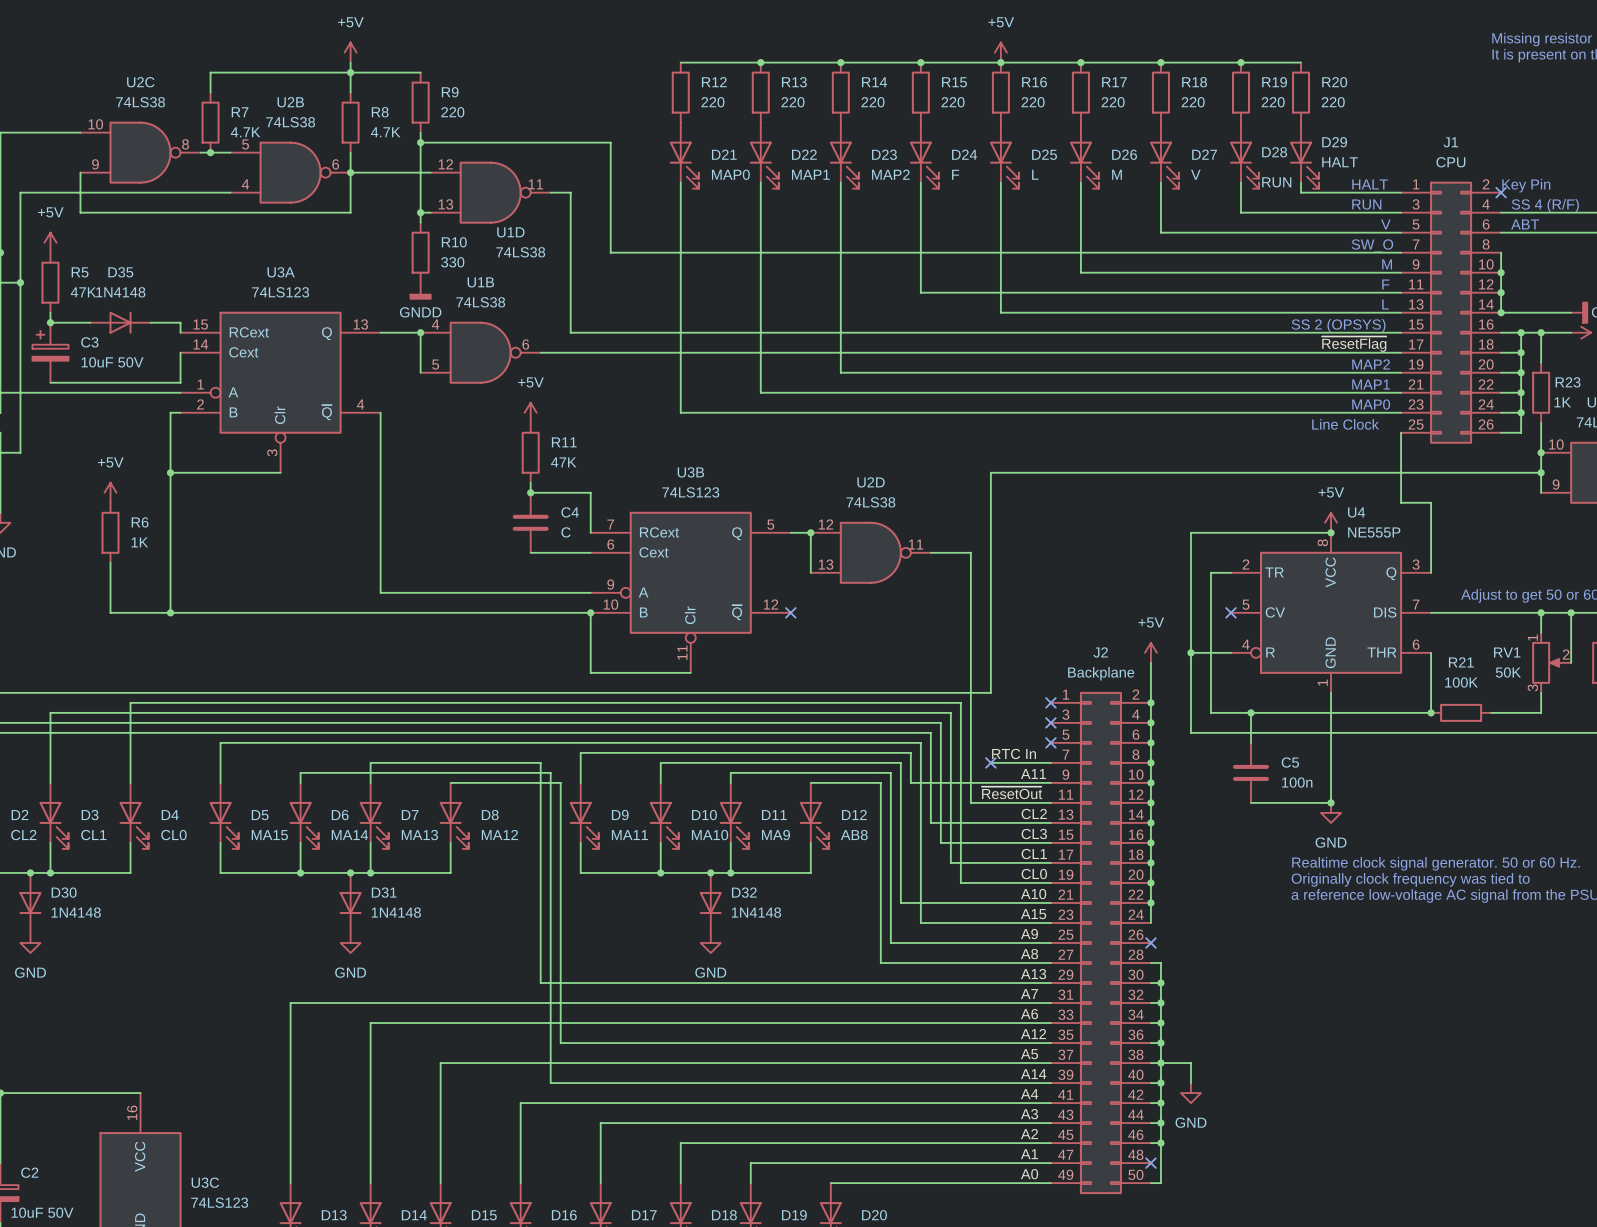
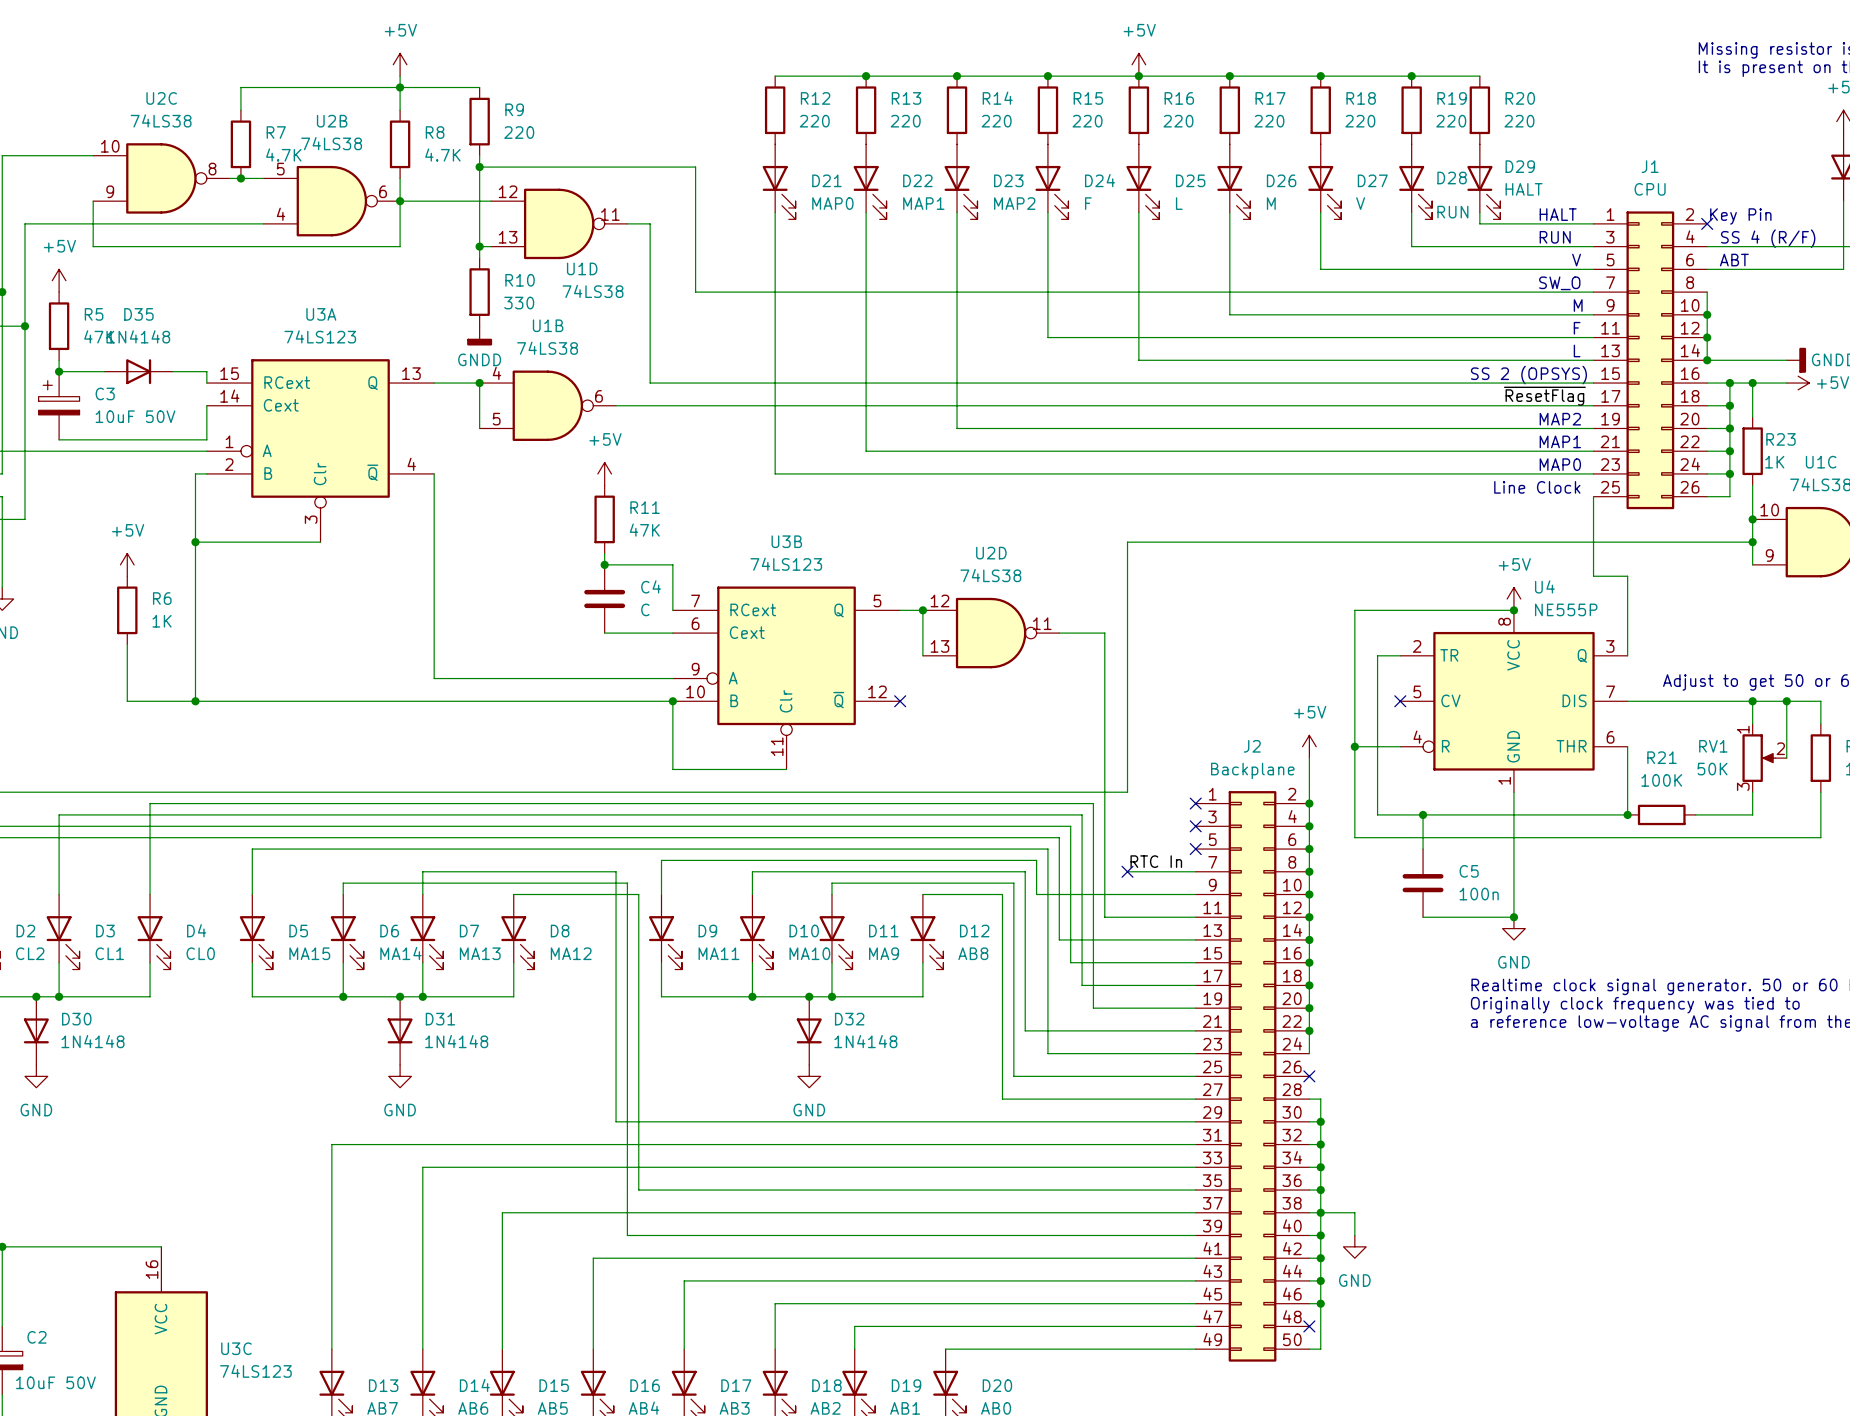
label: A11 (1033, 773) -> none
label: ~{ResetOut} (1012, 792) -> none
label: CL2 (1034, 814) -> none
label: CL3 (1034, 834) -> none
label: CL1 (1034, 854) -> none
label: CL0 (1034, 874) -> none
label: A10 (1033, 894) -> none
label: A15 (1033, 914) -> none
label: A9 (1029, 934) -> none
label: A8 (1029, 954) -> none
label: A13 (1033, 974) -> none
label: A7 (1029, 994) -> none
label: A6 (1029, 1014) -> none
label: A12 (1033, 1034) -> none
label: A5 (1029, 1054) -> none
label: A14 (1033, 1074) -> none
label: A4 (1029, 1094) -> none
label: A3 (1029, 1114) -> none
label: A2 (1029, 1134) -> none
label: A1 (1029, 1154) -> none
label: A0 (1029, 1174) -> none

